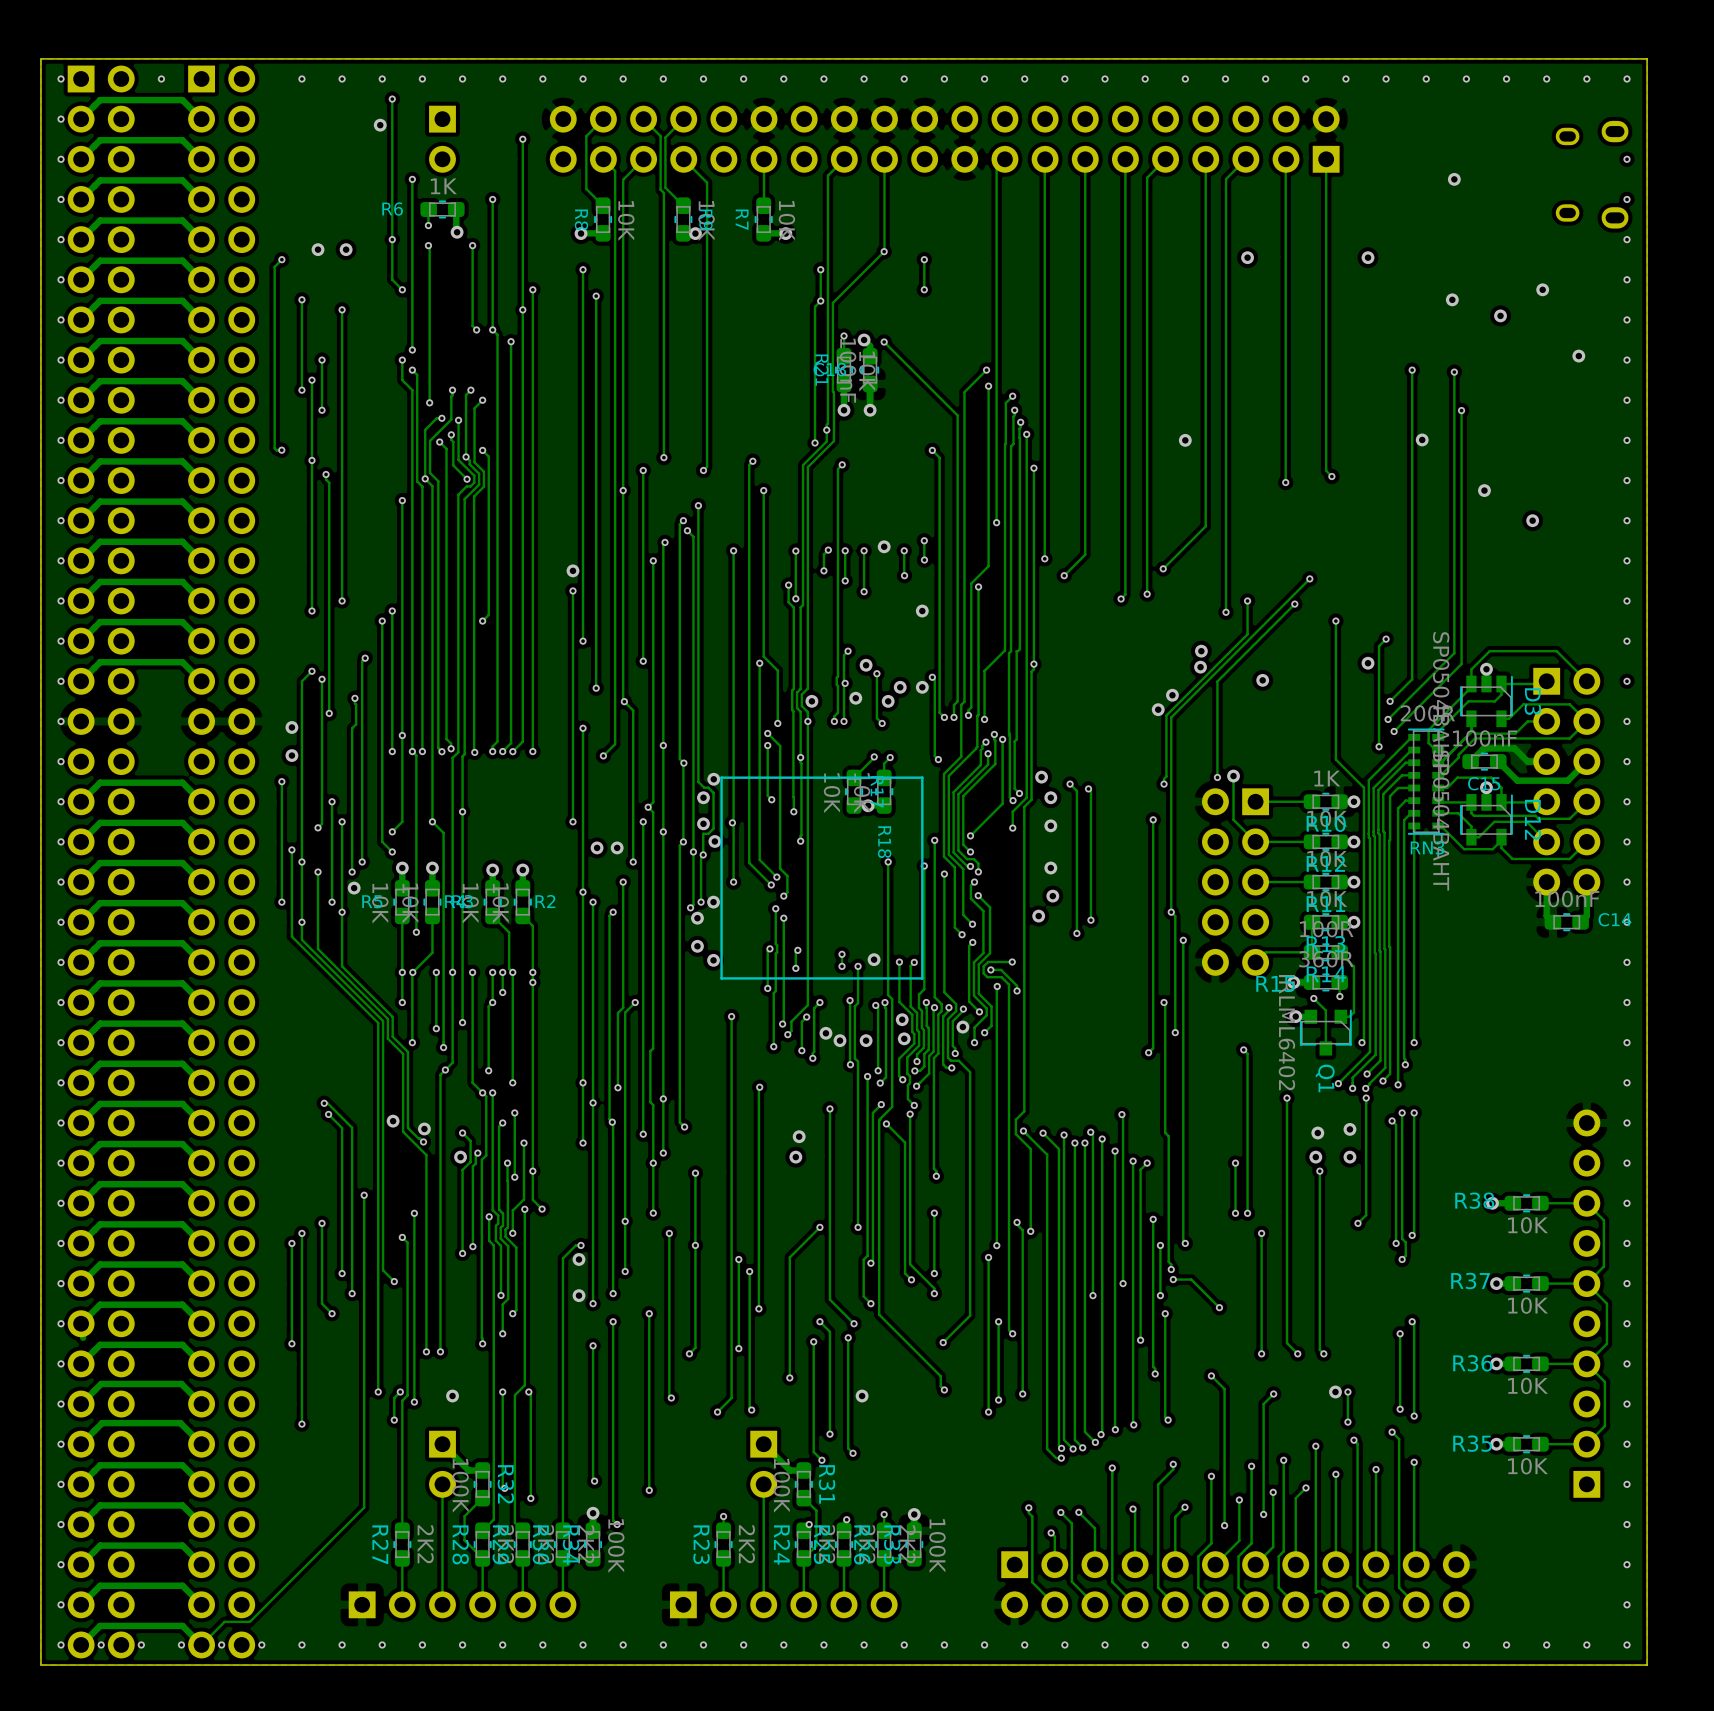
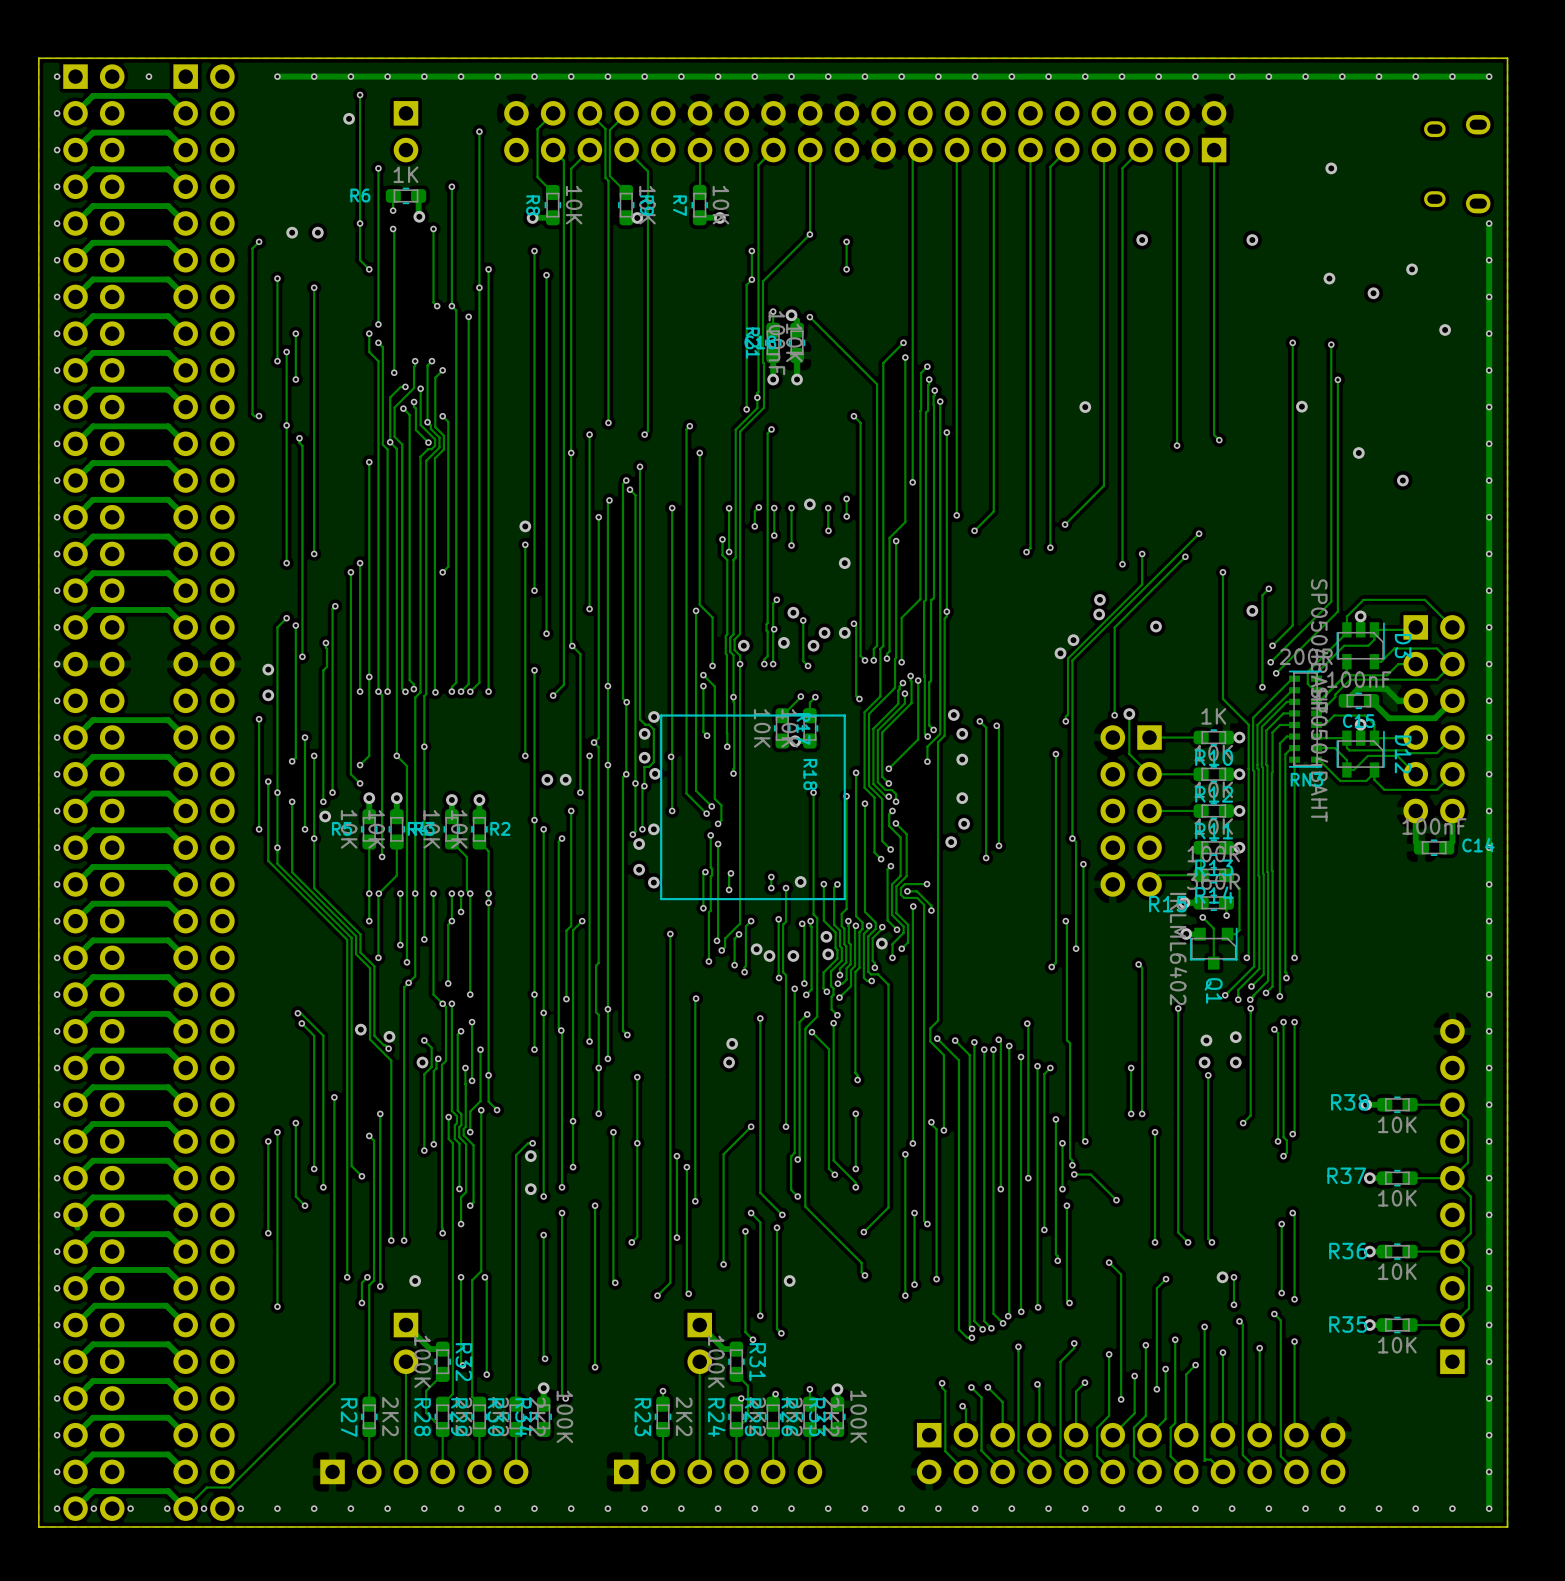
track: none -> (1489, 76) (277, 76)
via: (1627, 159) -> none
via: (1627, 199) -> none
track: none -> (1489, 223) (1489, 1508)

